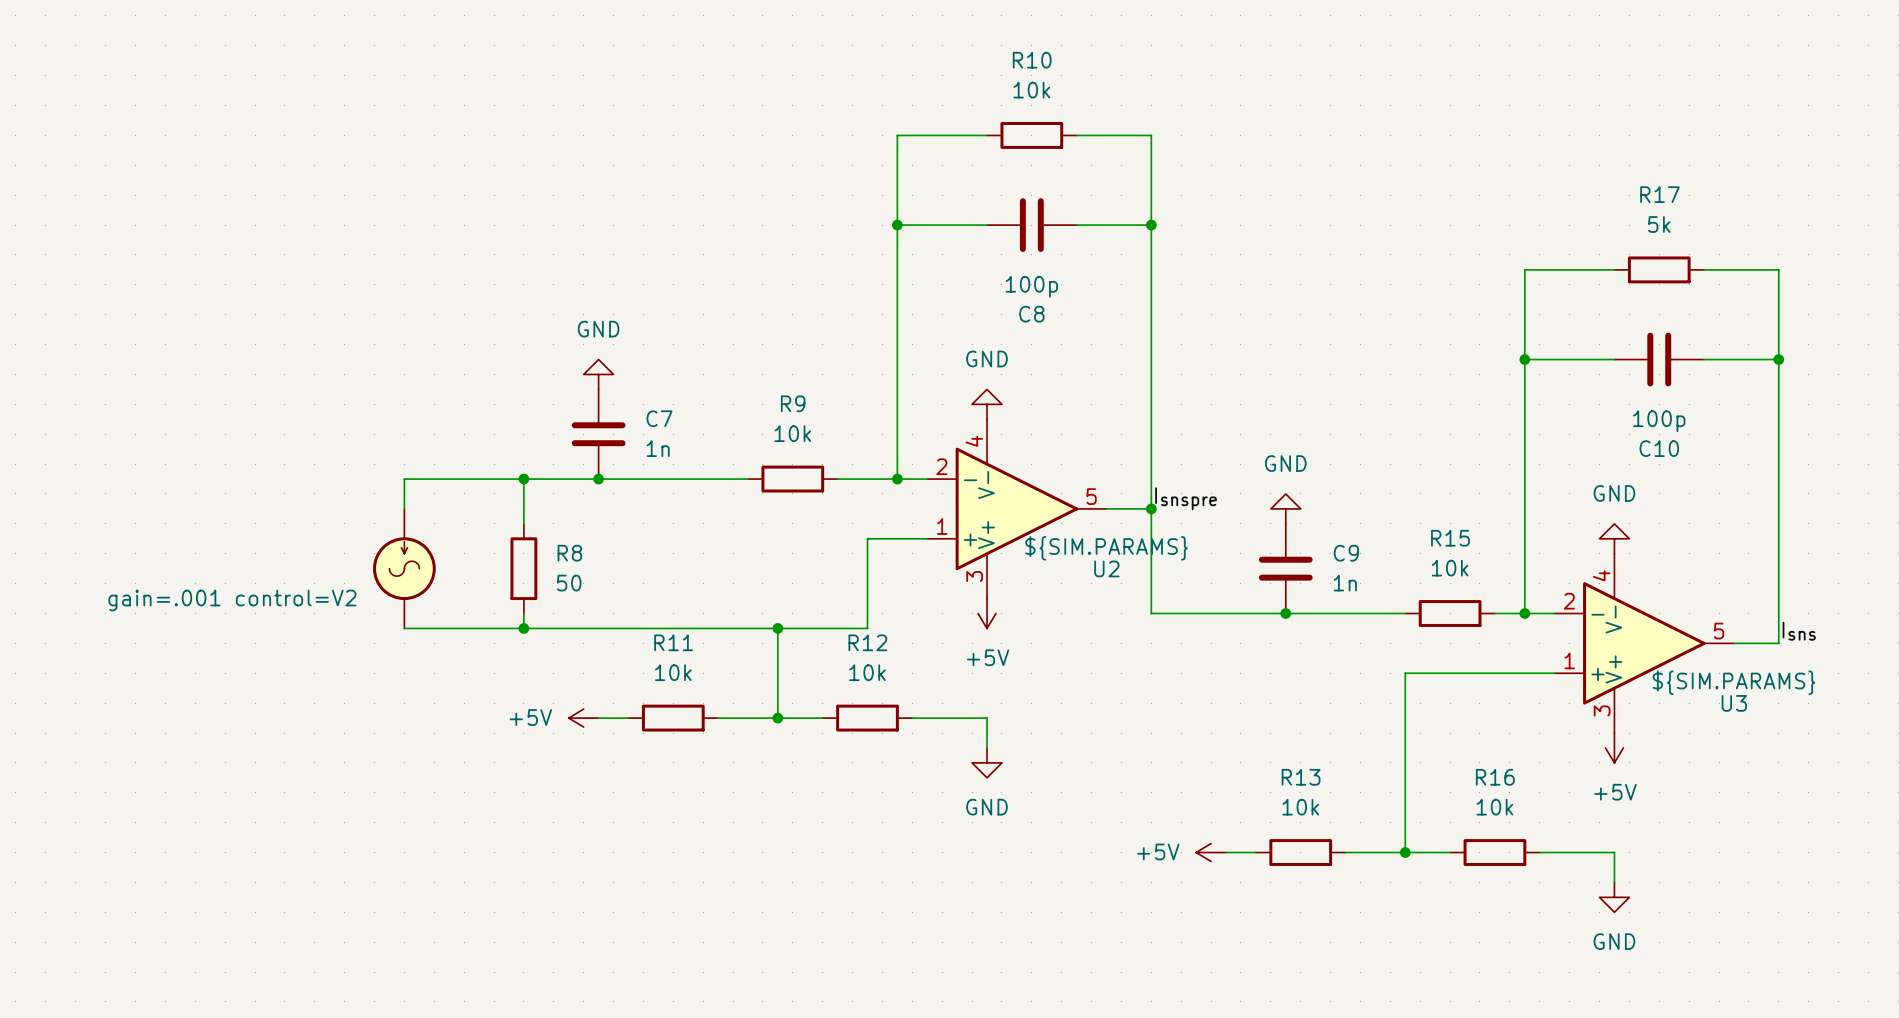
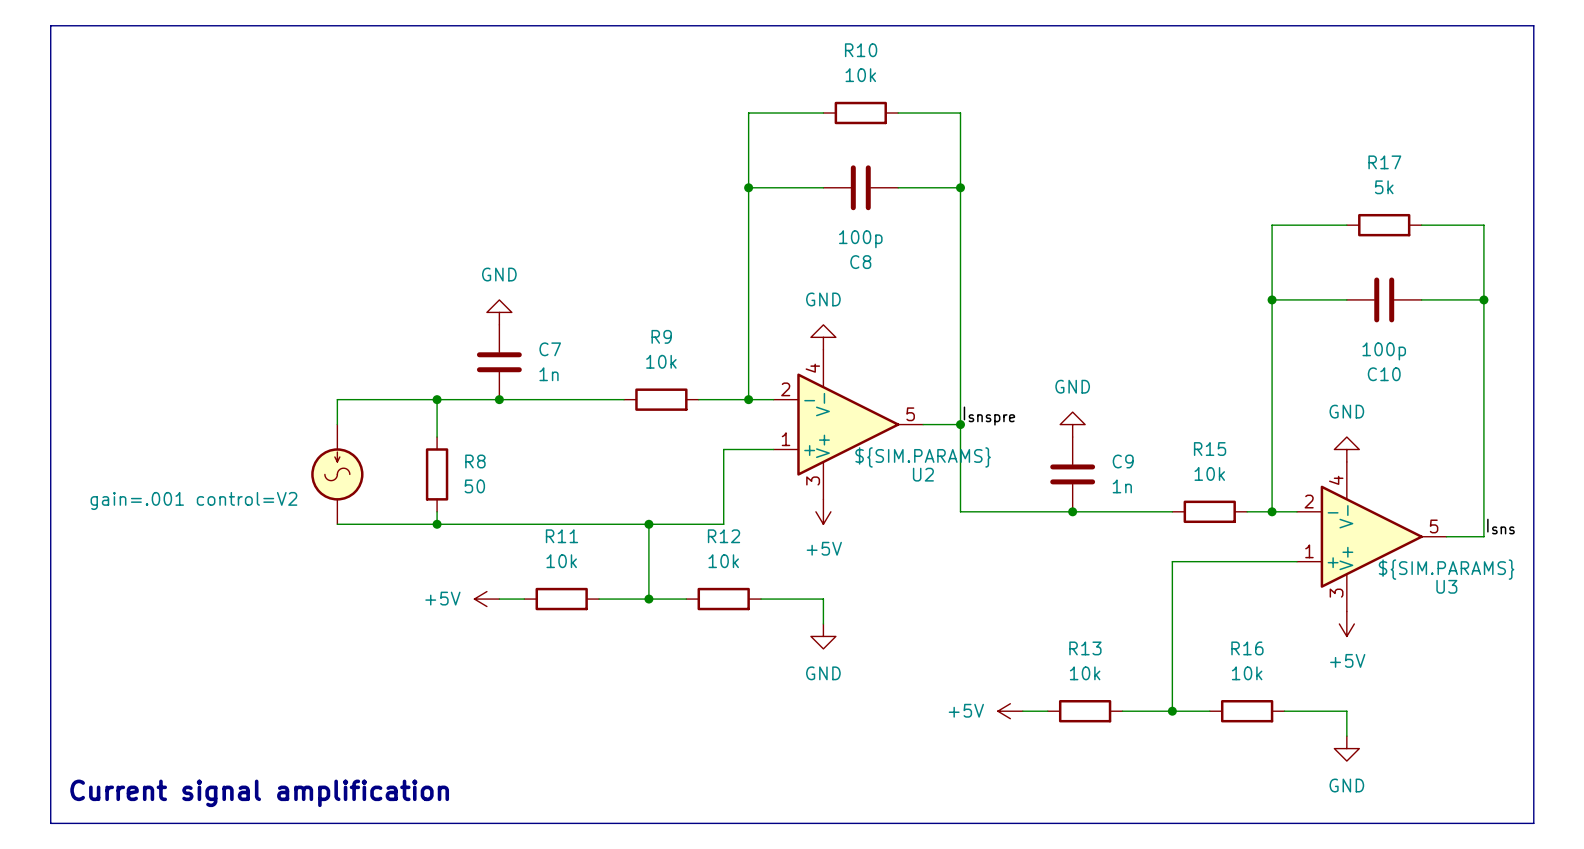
line: none -> (50, 25) (1533, 25) (1533, 823) (50, 823) (50, 25)
text: none -> Current signal amplification (259, 793)

